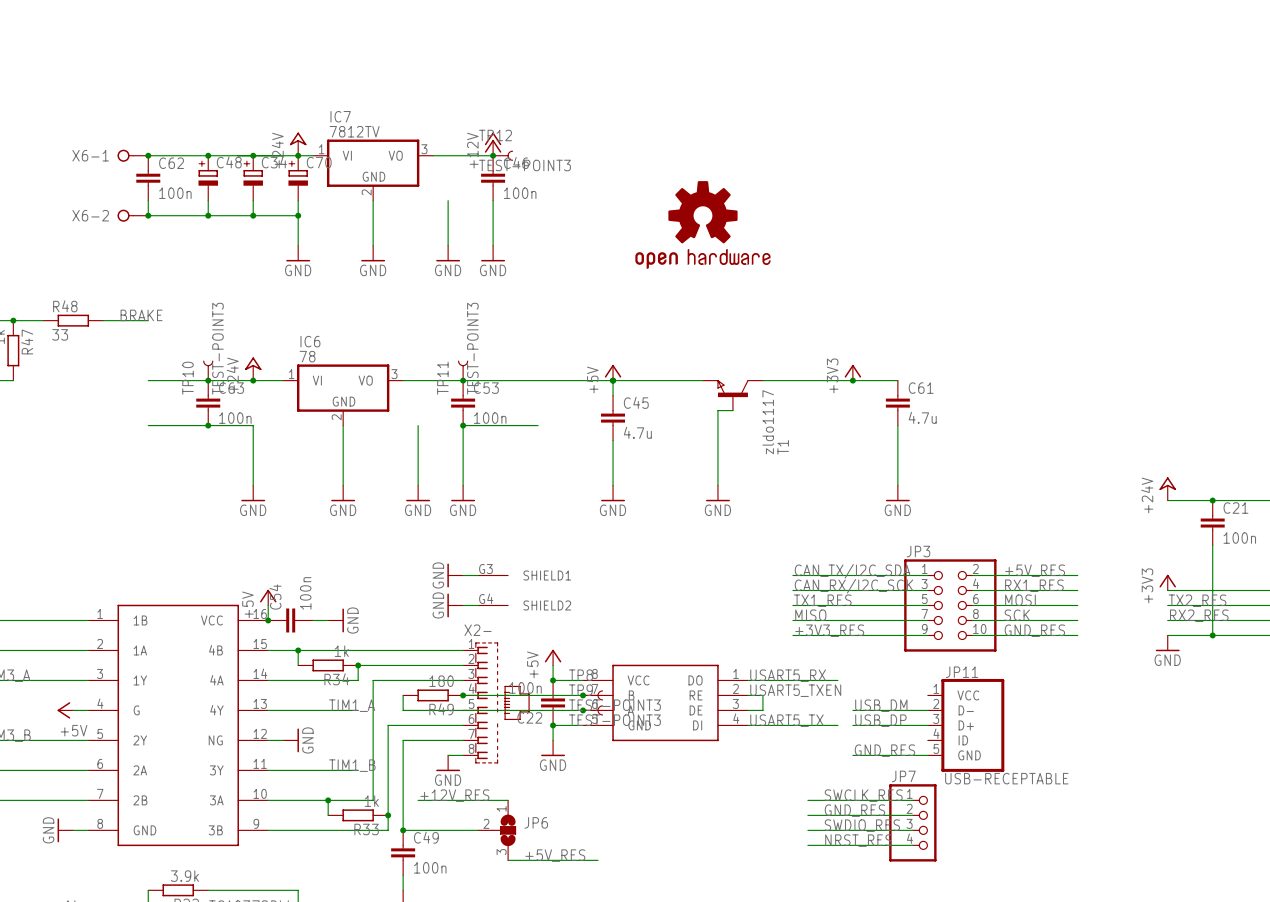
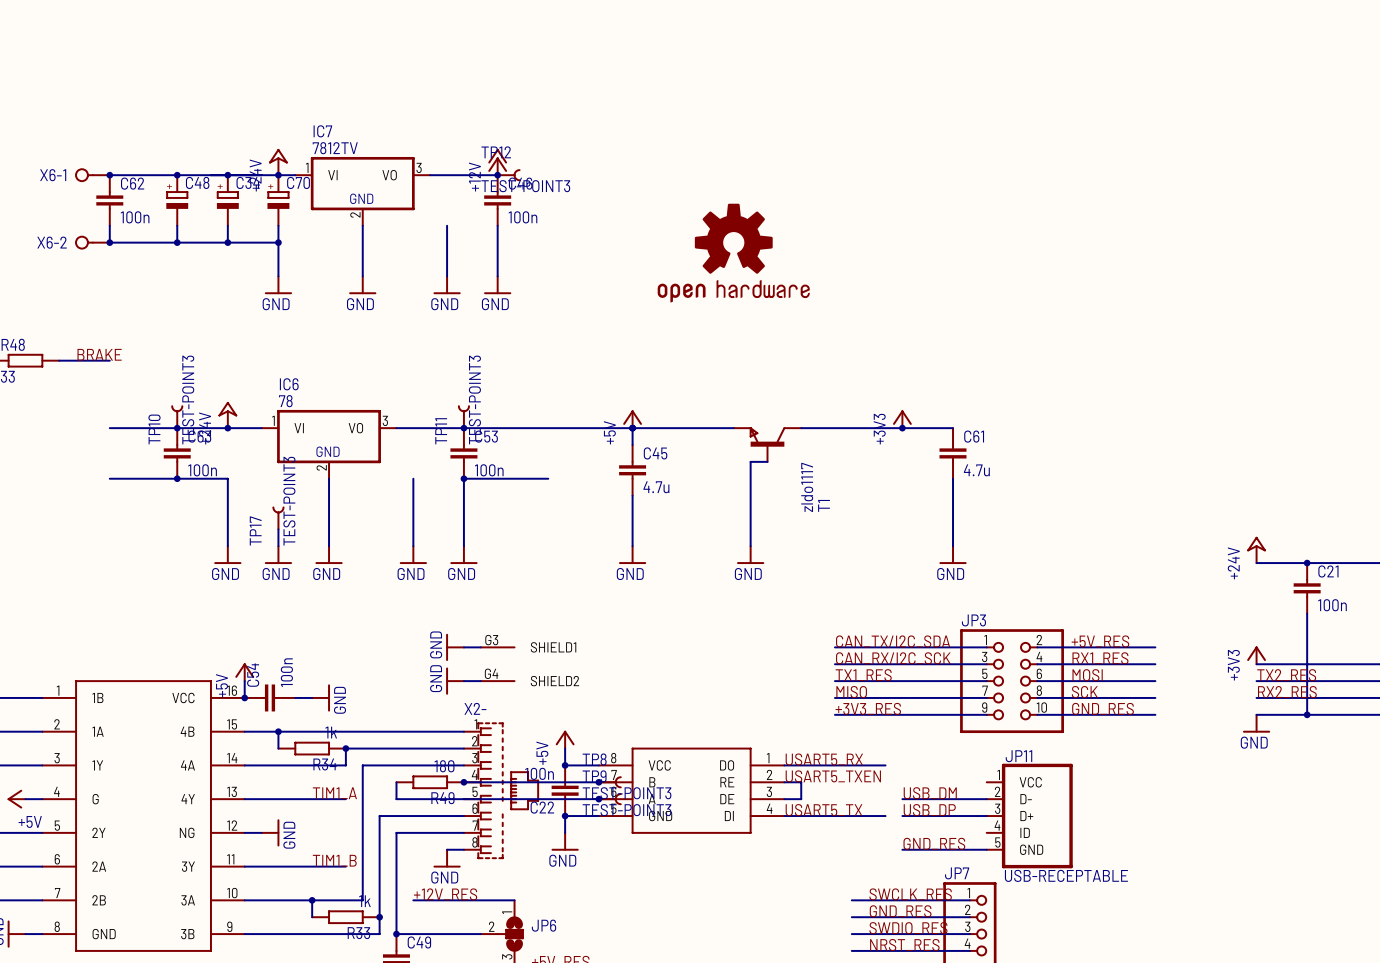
TP17: none -> TEST-POINT3 (278, 518)
wire: none -> (278, 529) (278, 546)
power symbol: none -> GND (278, 555)

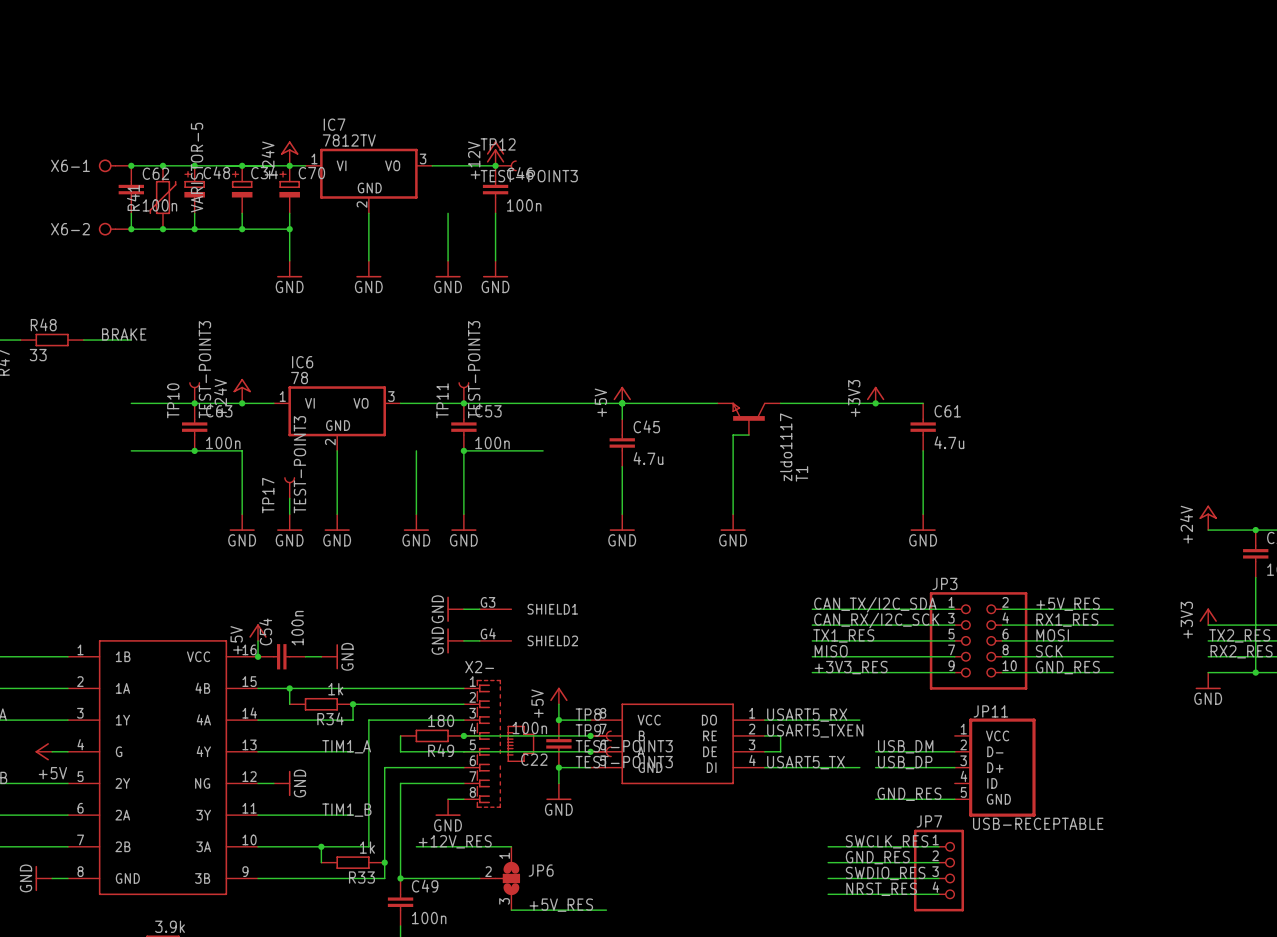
junction: none -> (163, 165)
R41: none -> VARISTOR-5 (163, 197)
junction: none -> (163, 229)
part: (733, 253) -> none

